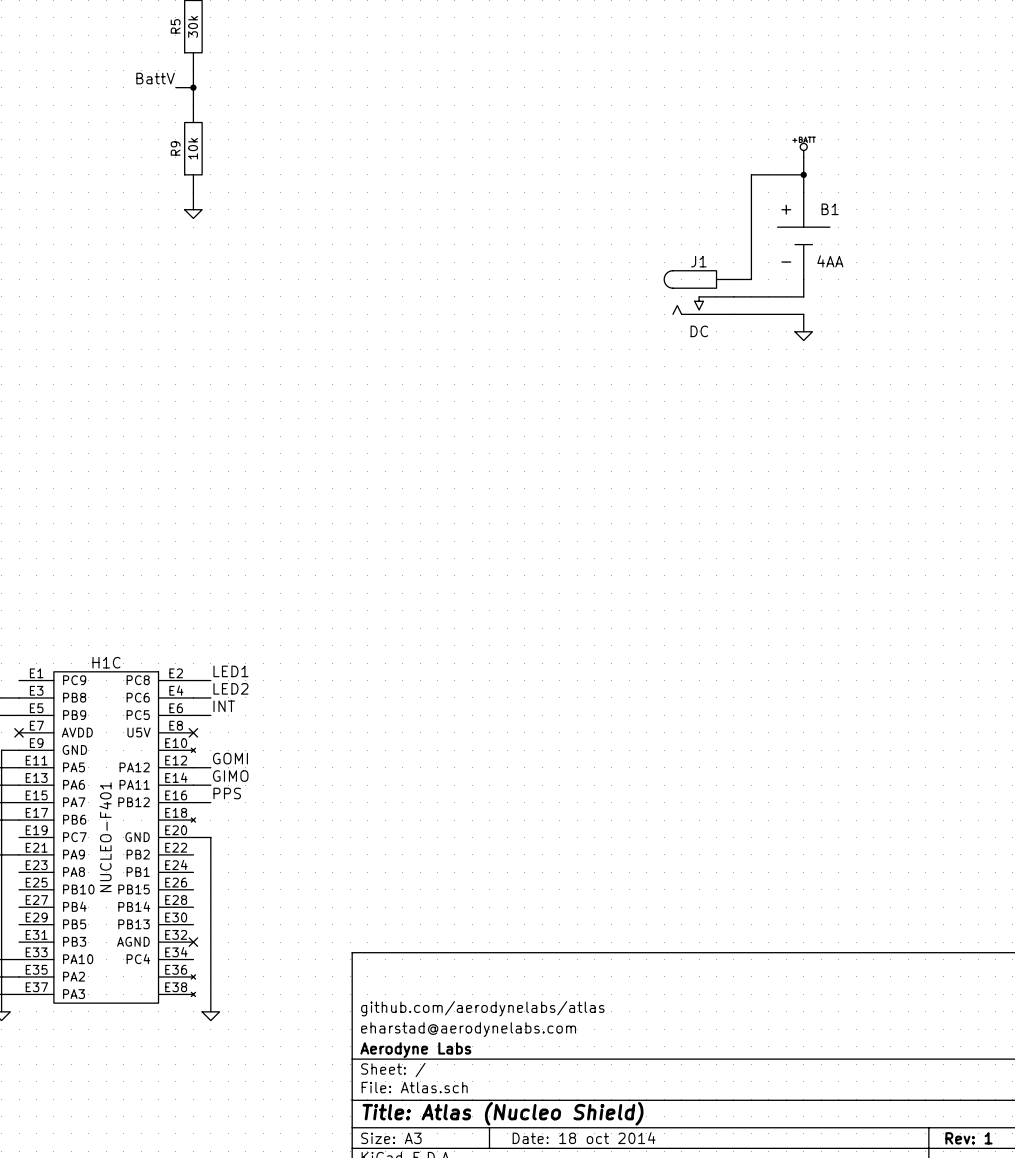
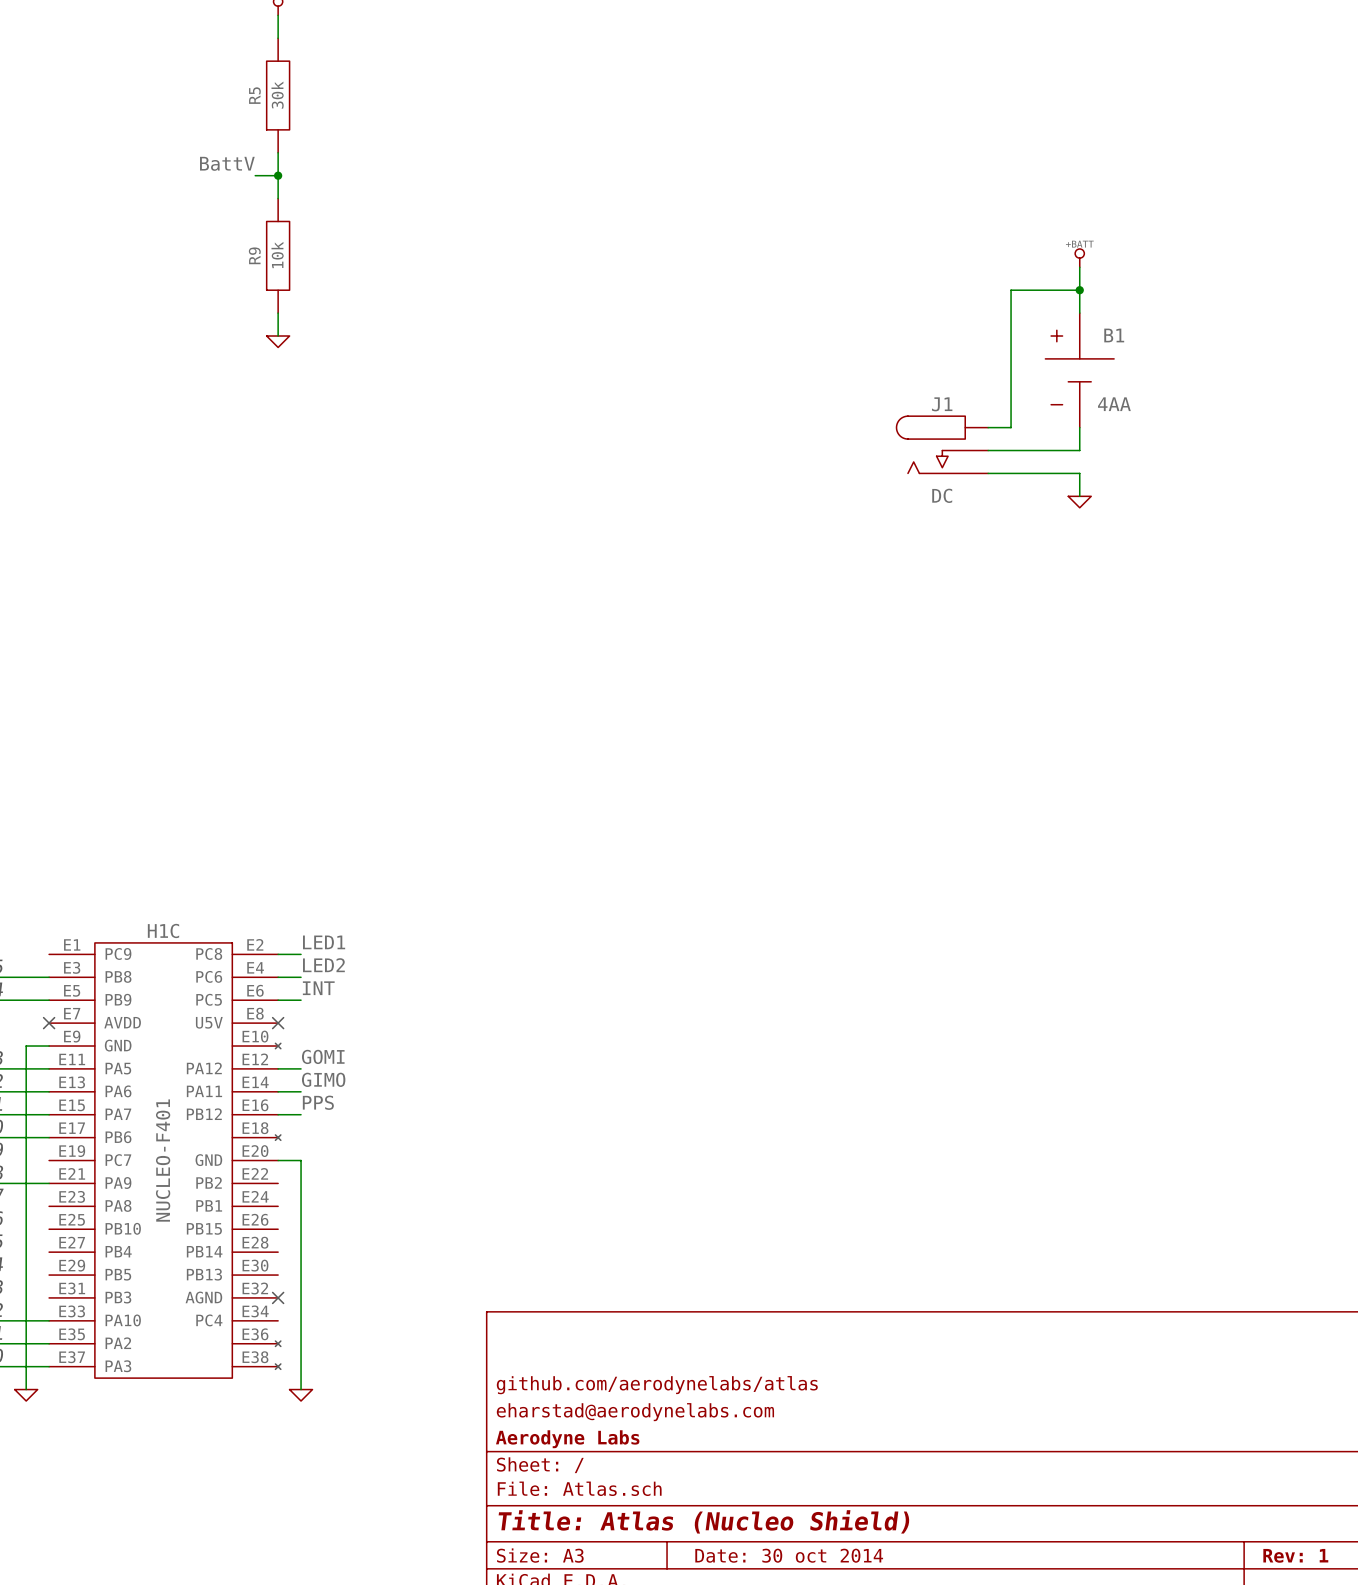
title block: Date: 18 oct 2014 (584, 1138) -> Date: 30 oct 2014 (789, 1555)

